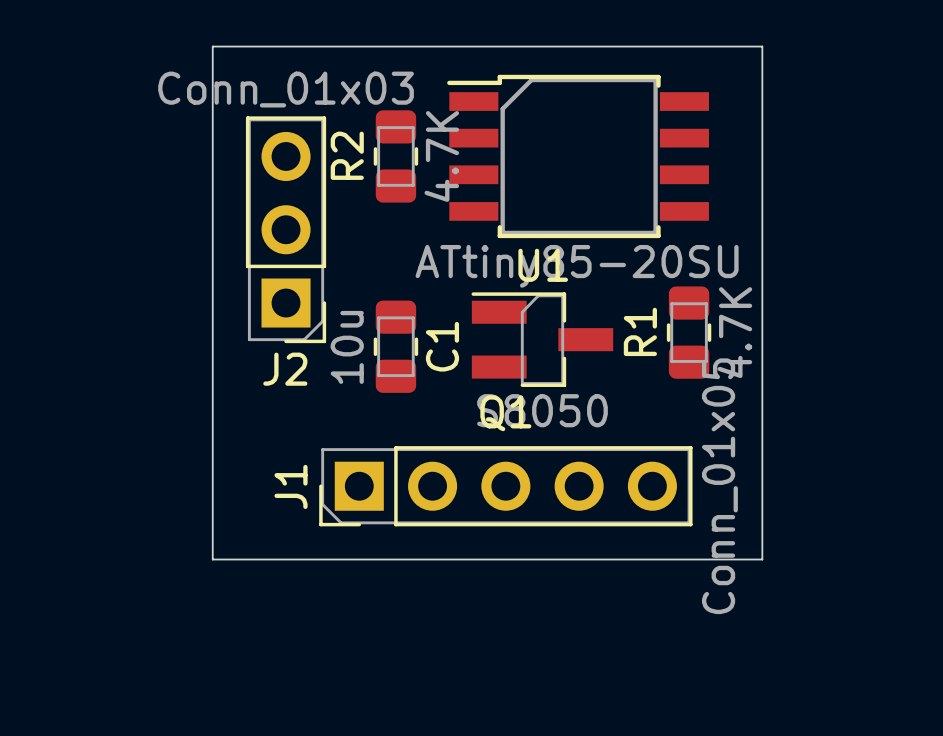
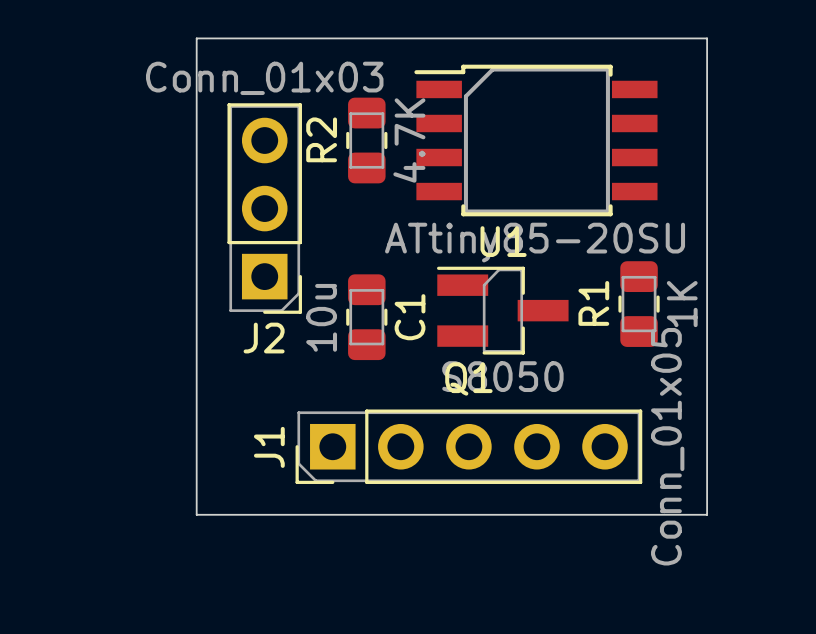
R1 value: 4.7K (734, 332) -> 1K (682, 304)

